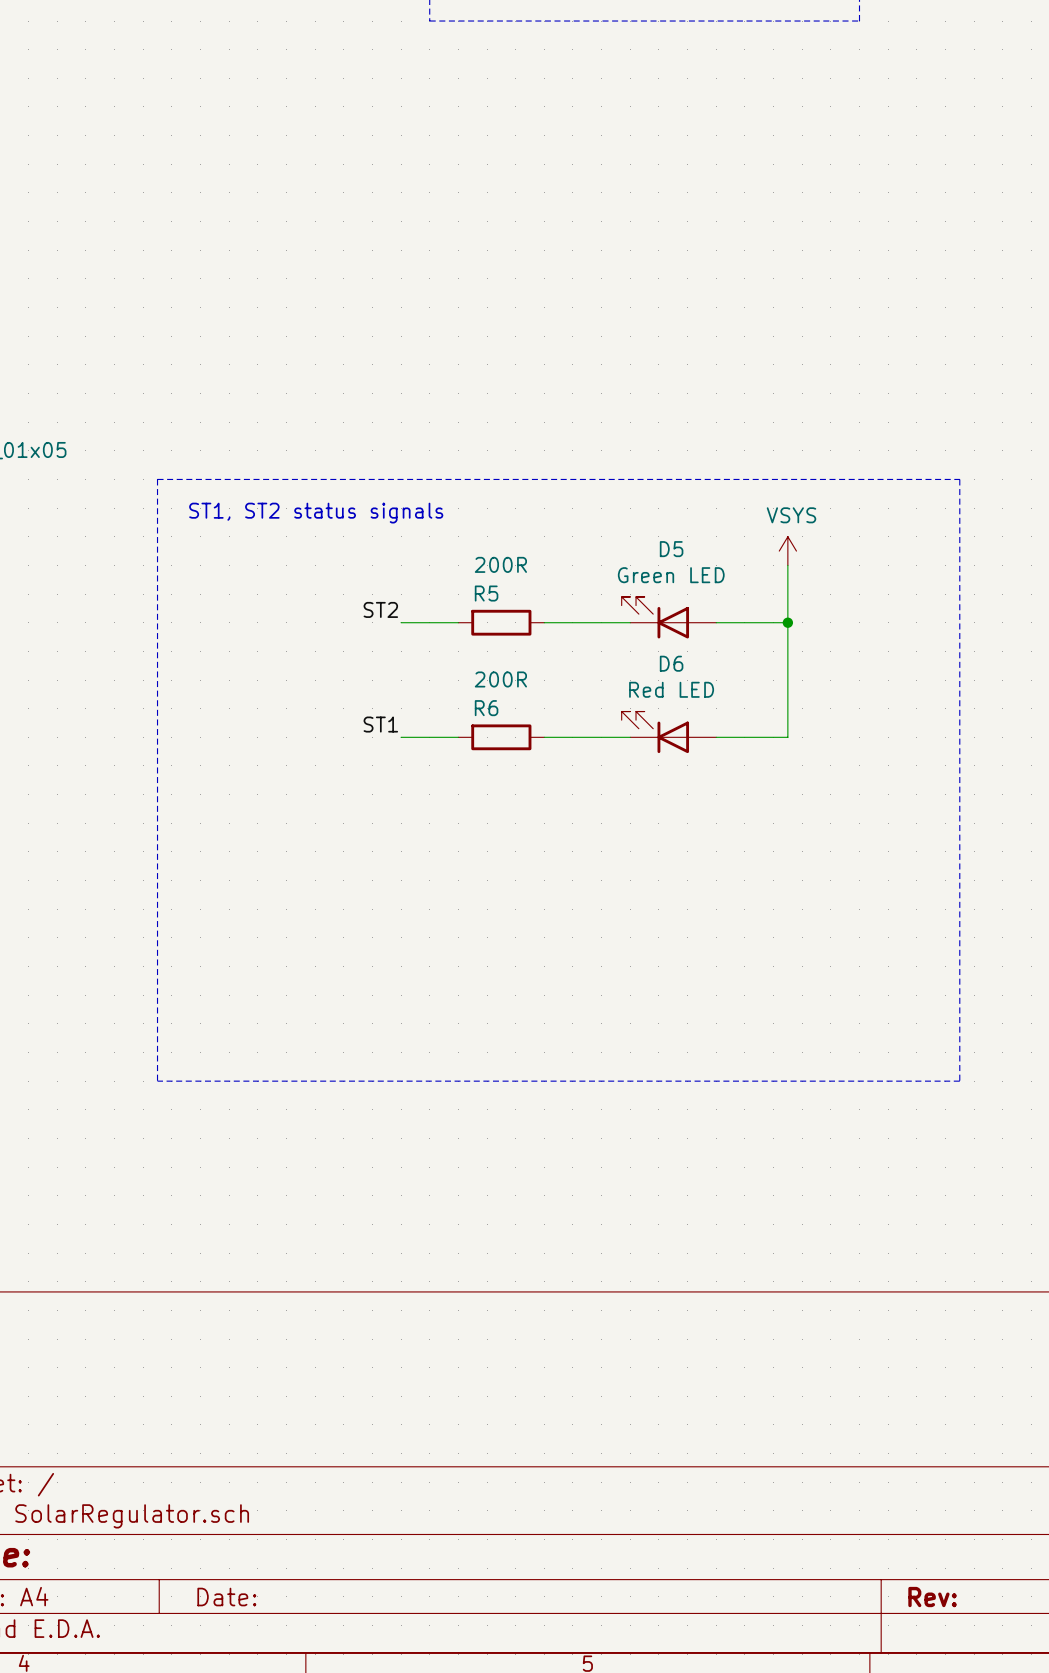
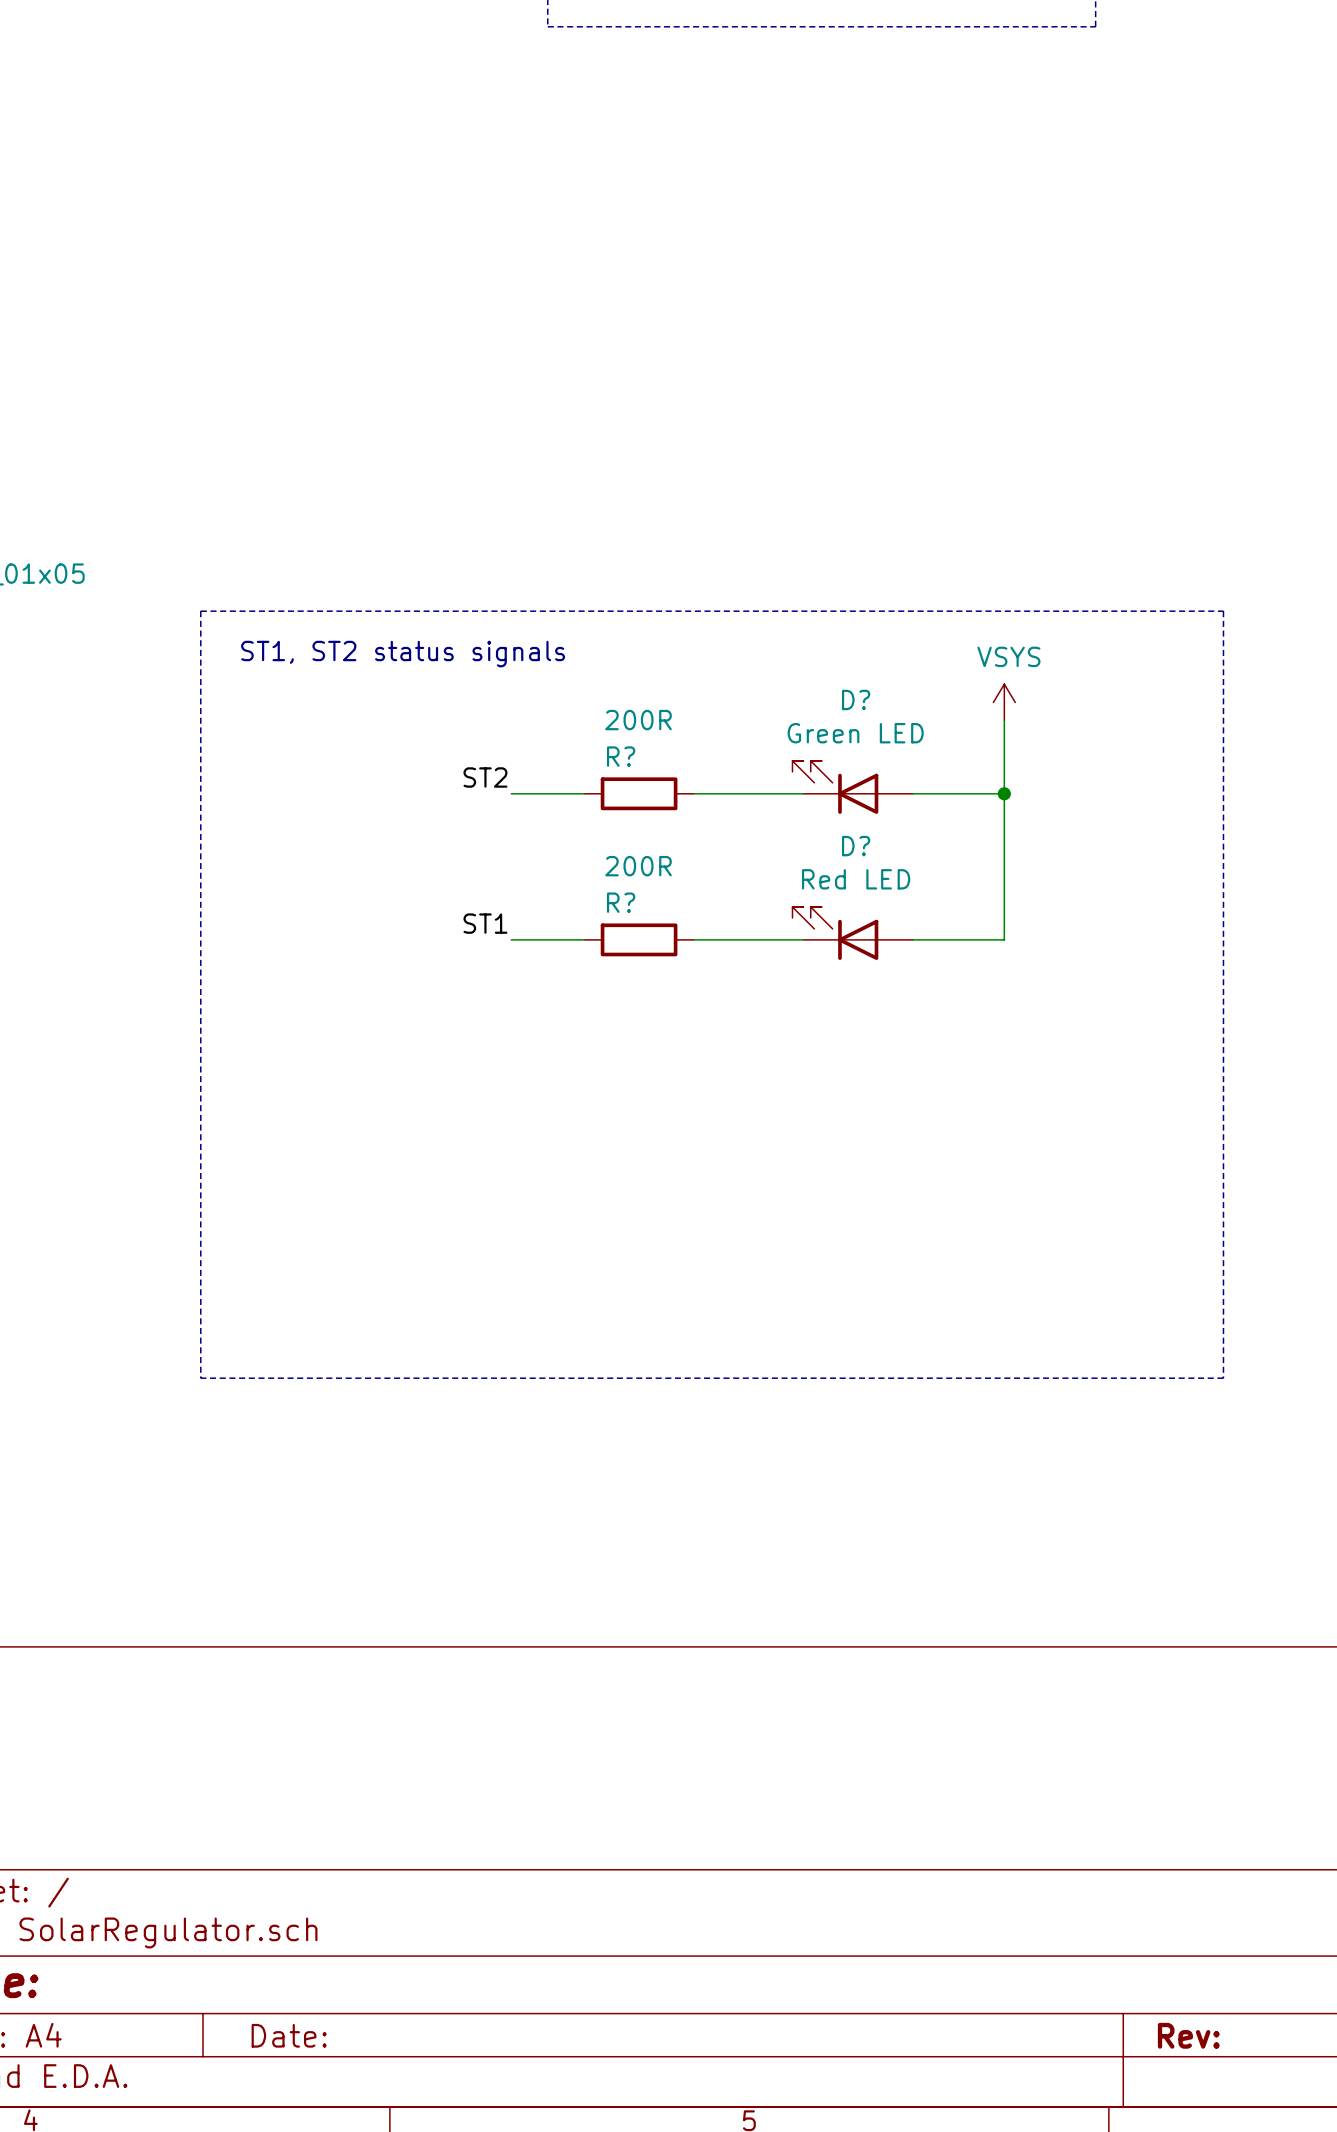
D5 name: D5 (671, 549) -> D? (856, 699)
R5 name: R5 (486, 593) -> R? (621, 756)
D6 name: D6 (671, 663) -> D? (856, 846)
R6 name: R6 (486, 708) -> R? (621, 902)

